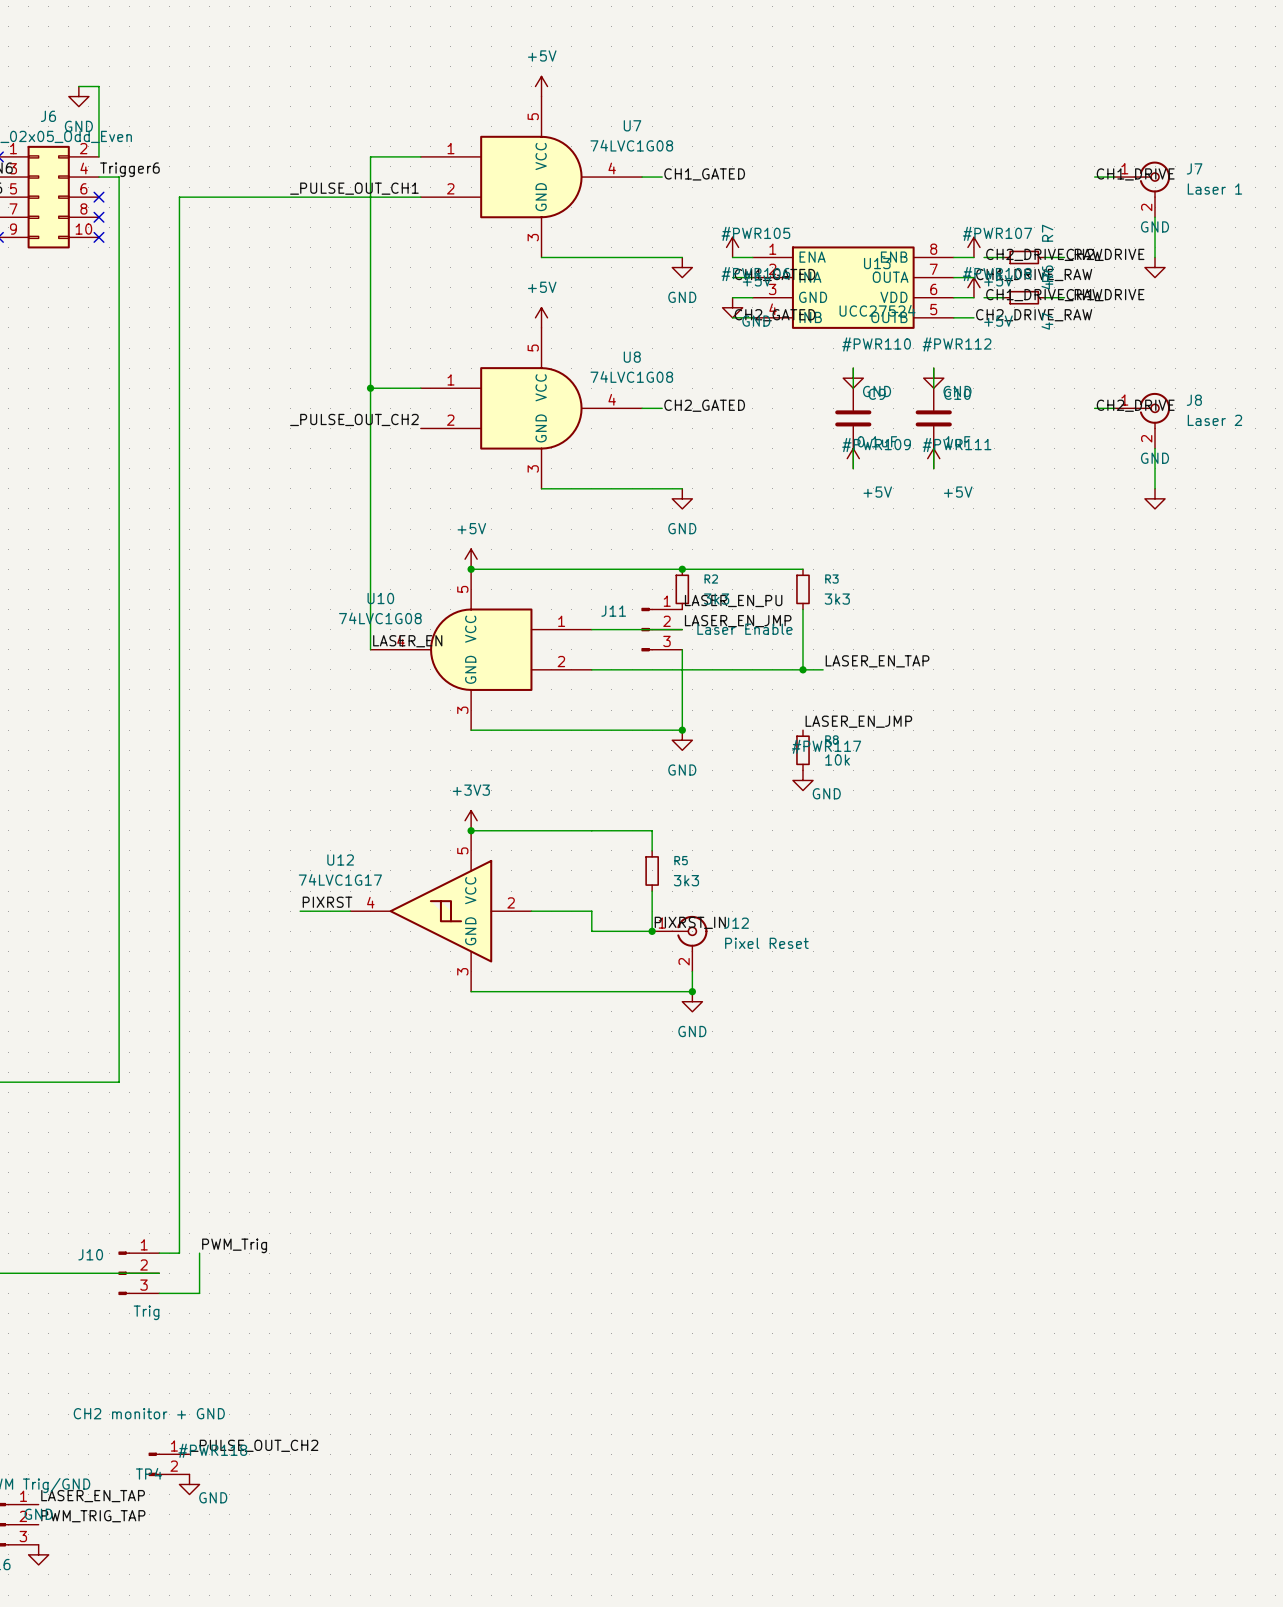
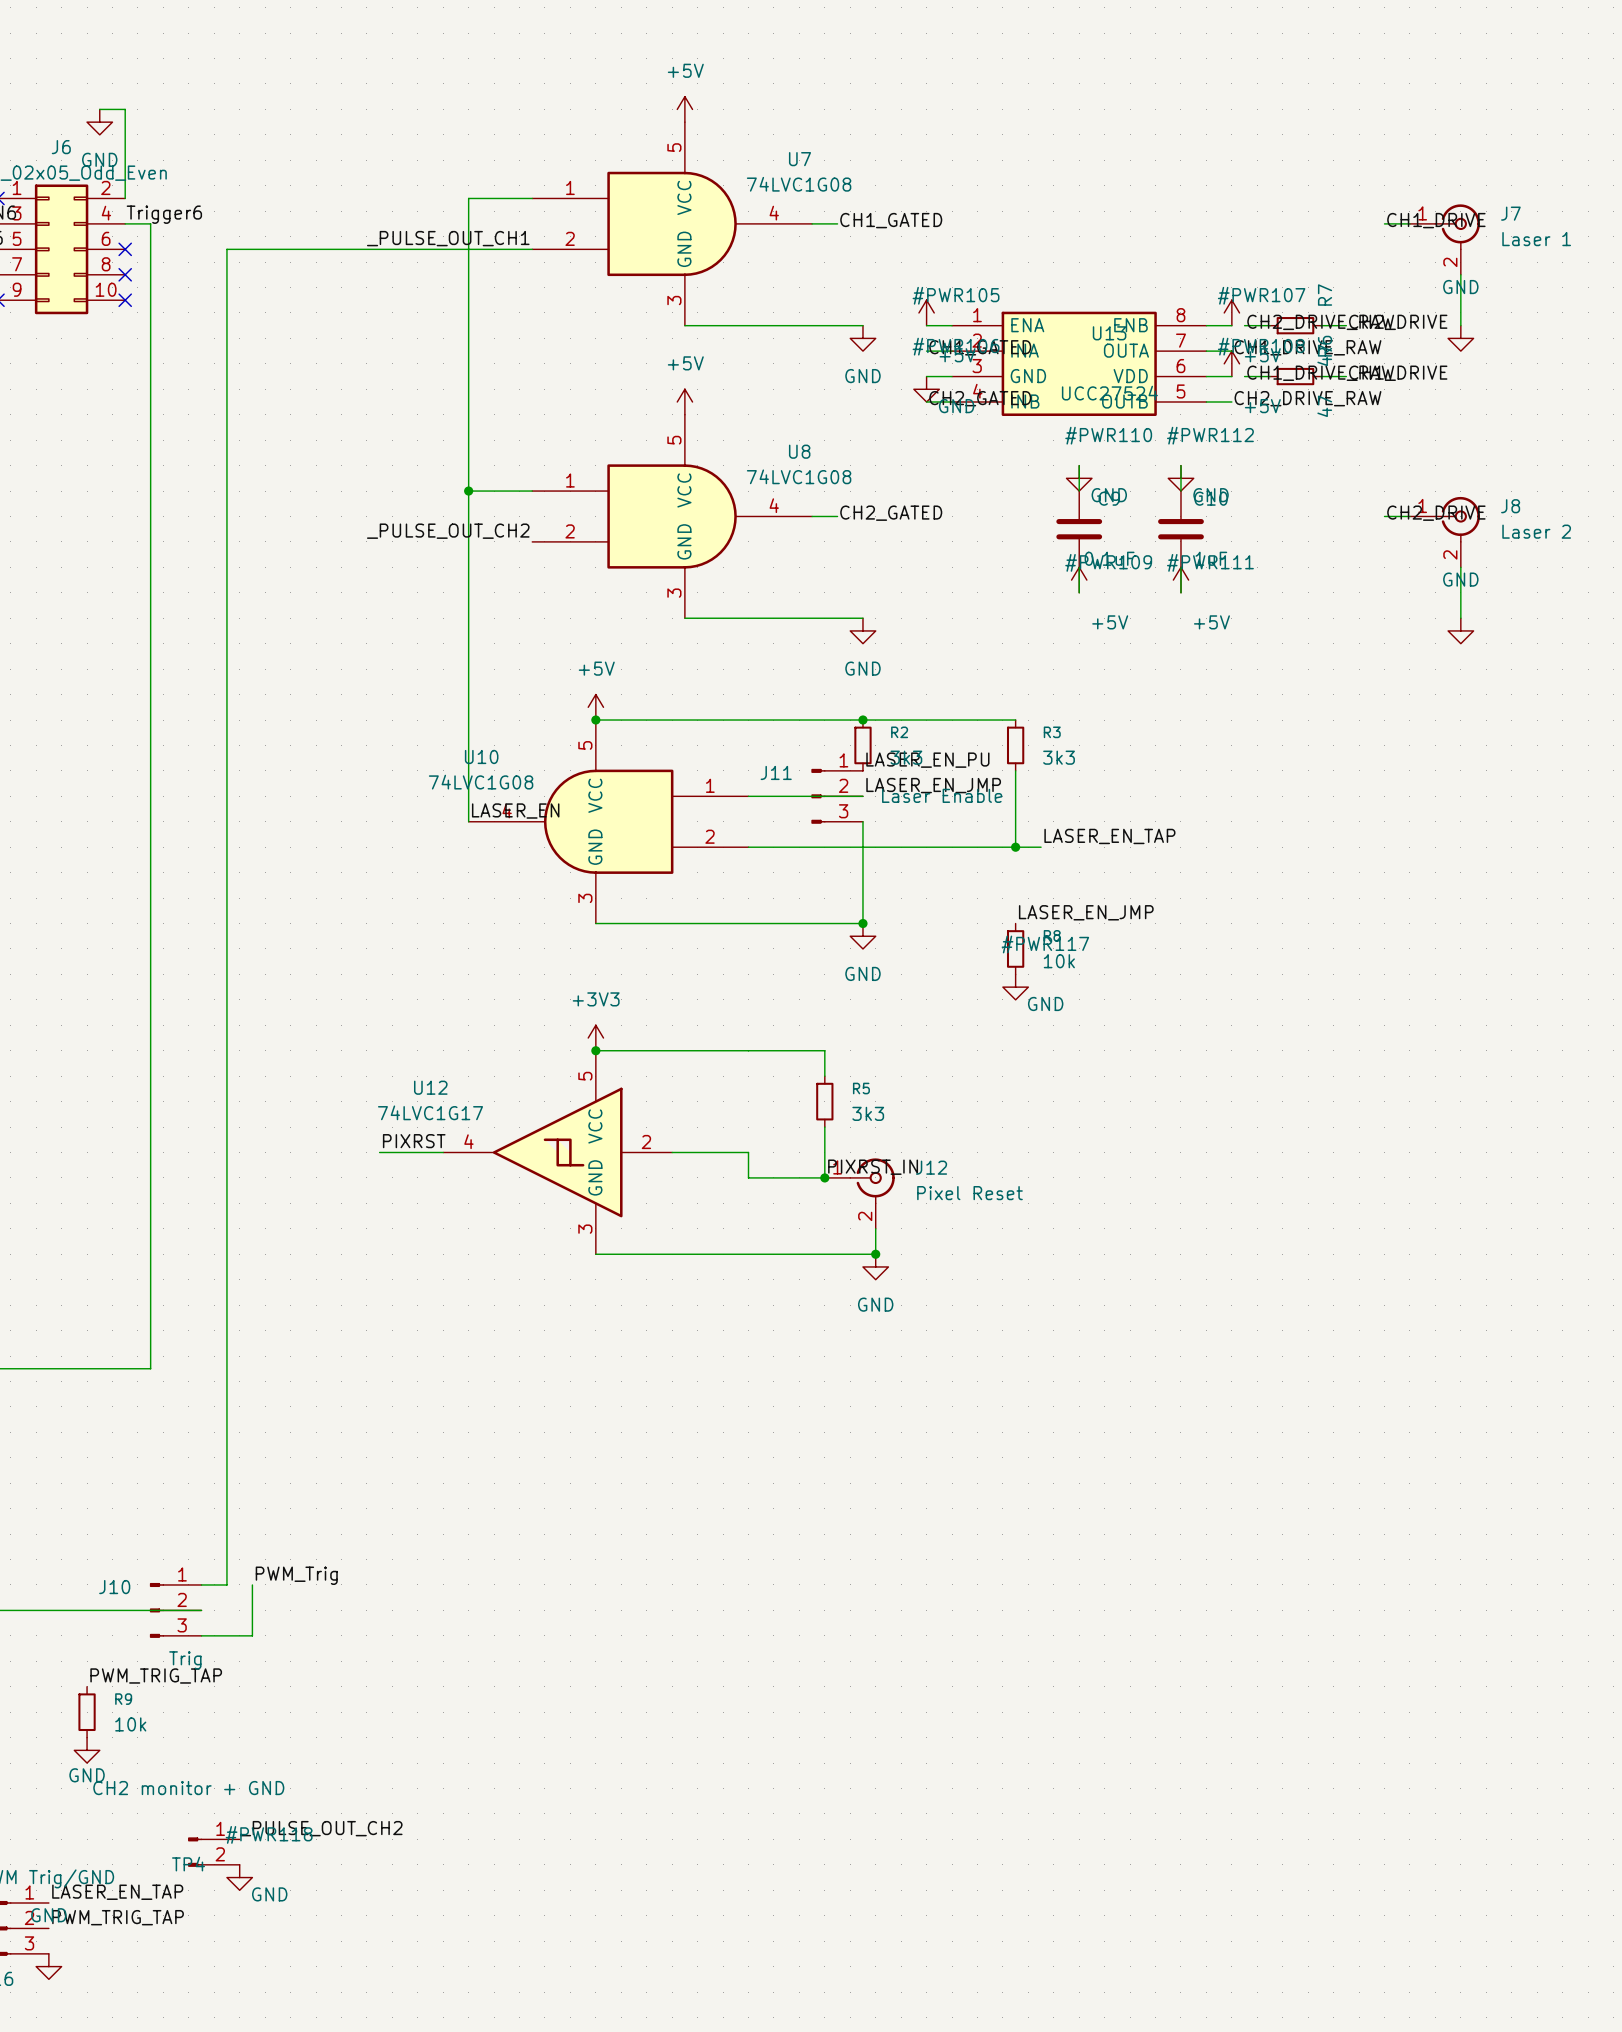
label: none -> PWM_TRIG_TAP (156, 1676)
R9: none -> 10k (87, 1712)
power symbol: none -> GND (87, 1750)

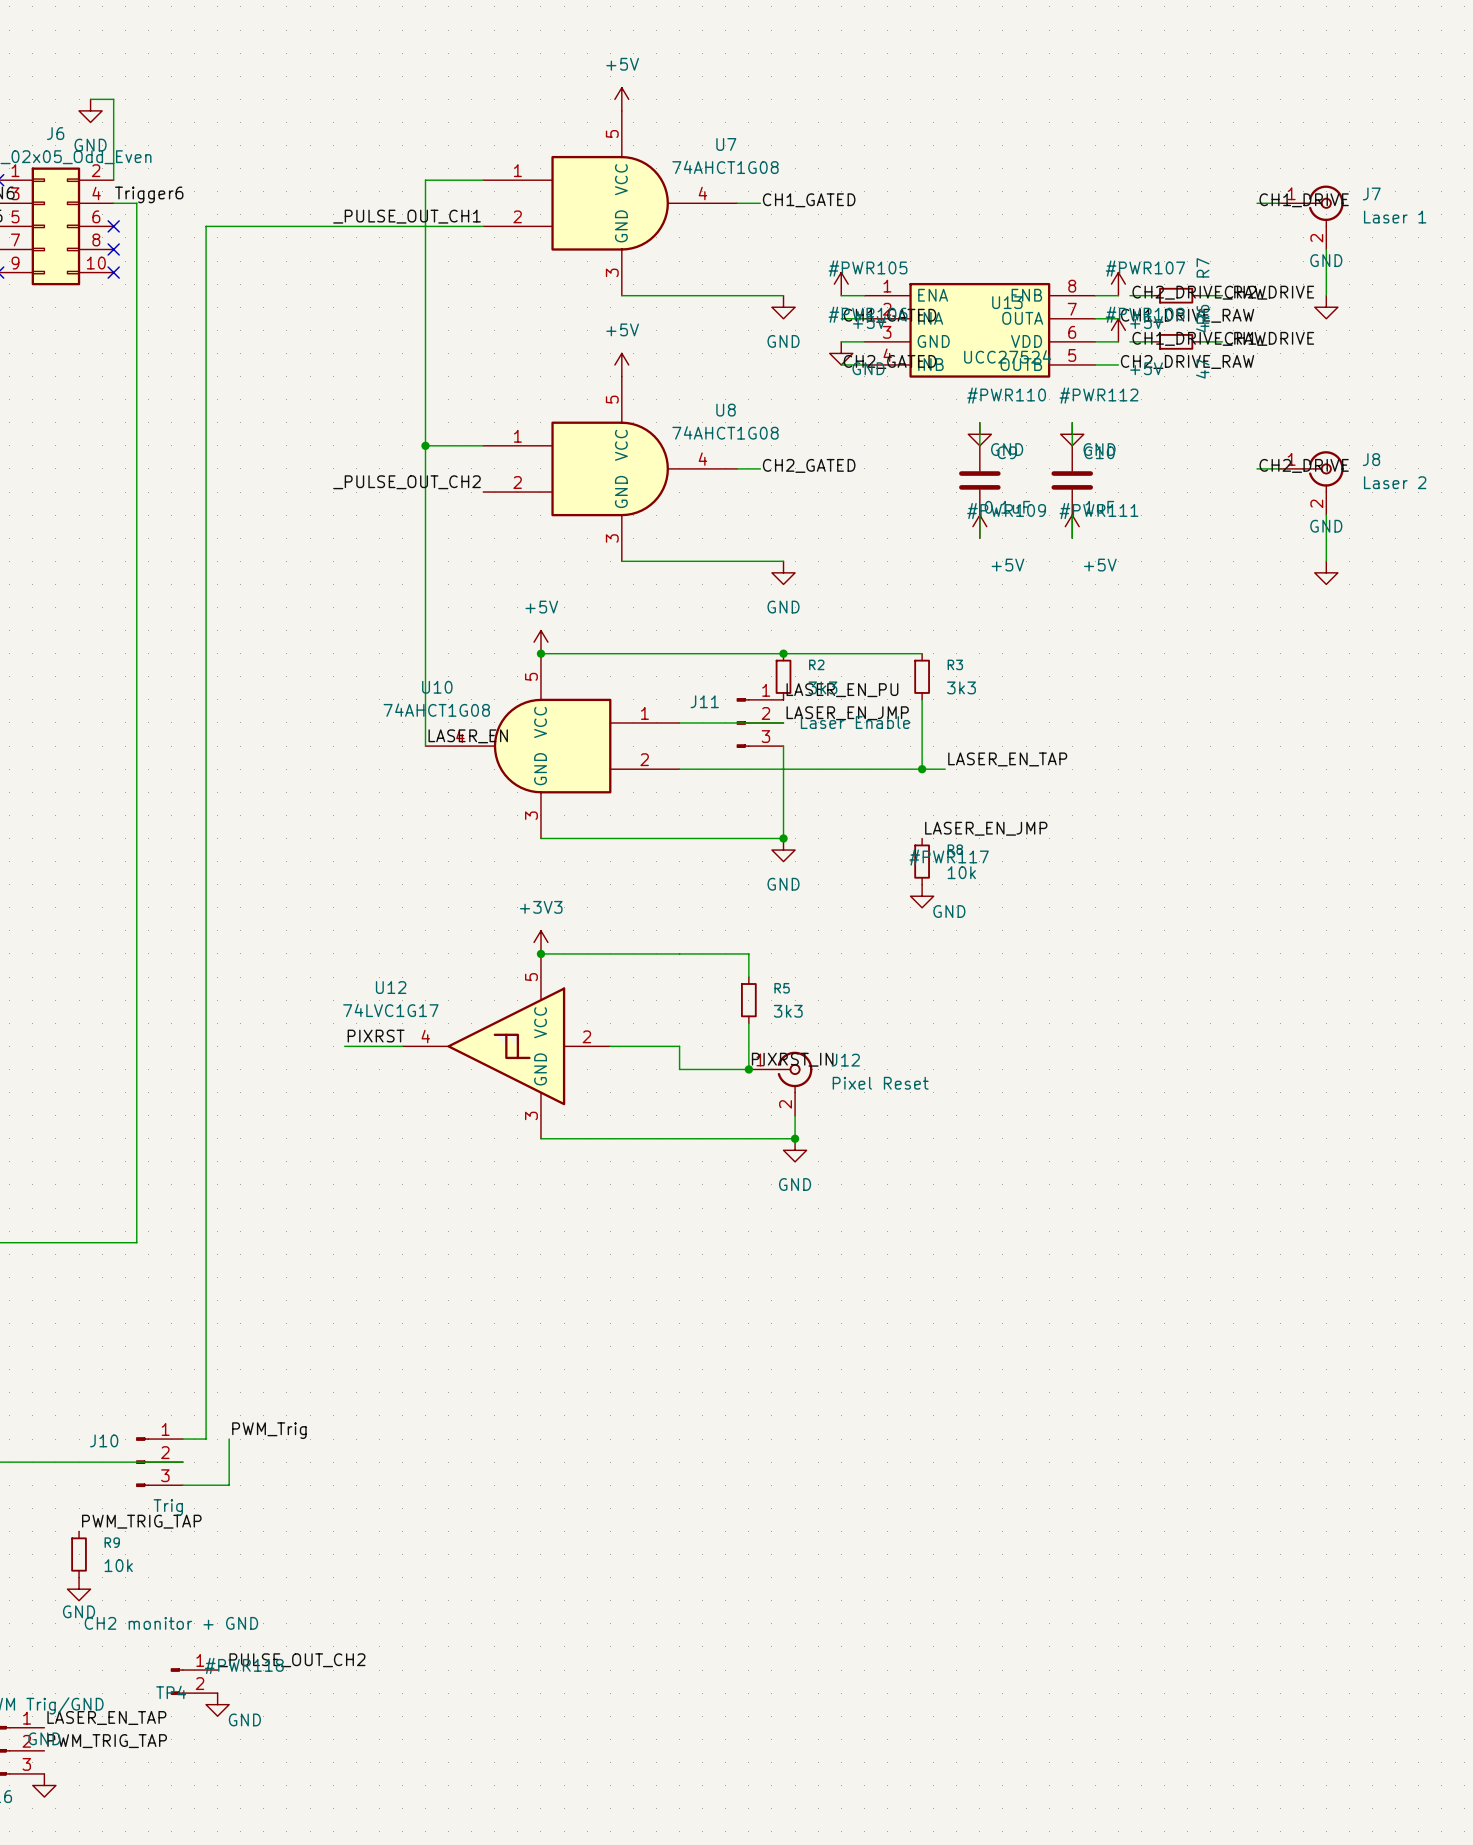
U7 value: 74LVC1G08 (799, 184) -> 74AHCT1G08 (725, 167)
U8 value: 74LVC1G08 (799, 476) -> 74AHCT1G08 (725, 432)
U10 value: 74LVC1G08 (481, 782) -> 74AHCT1G08 (436, 710)

